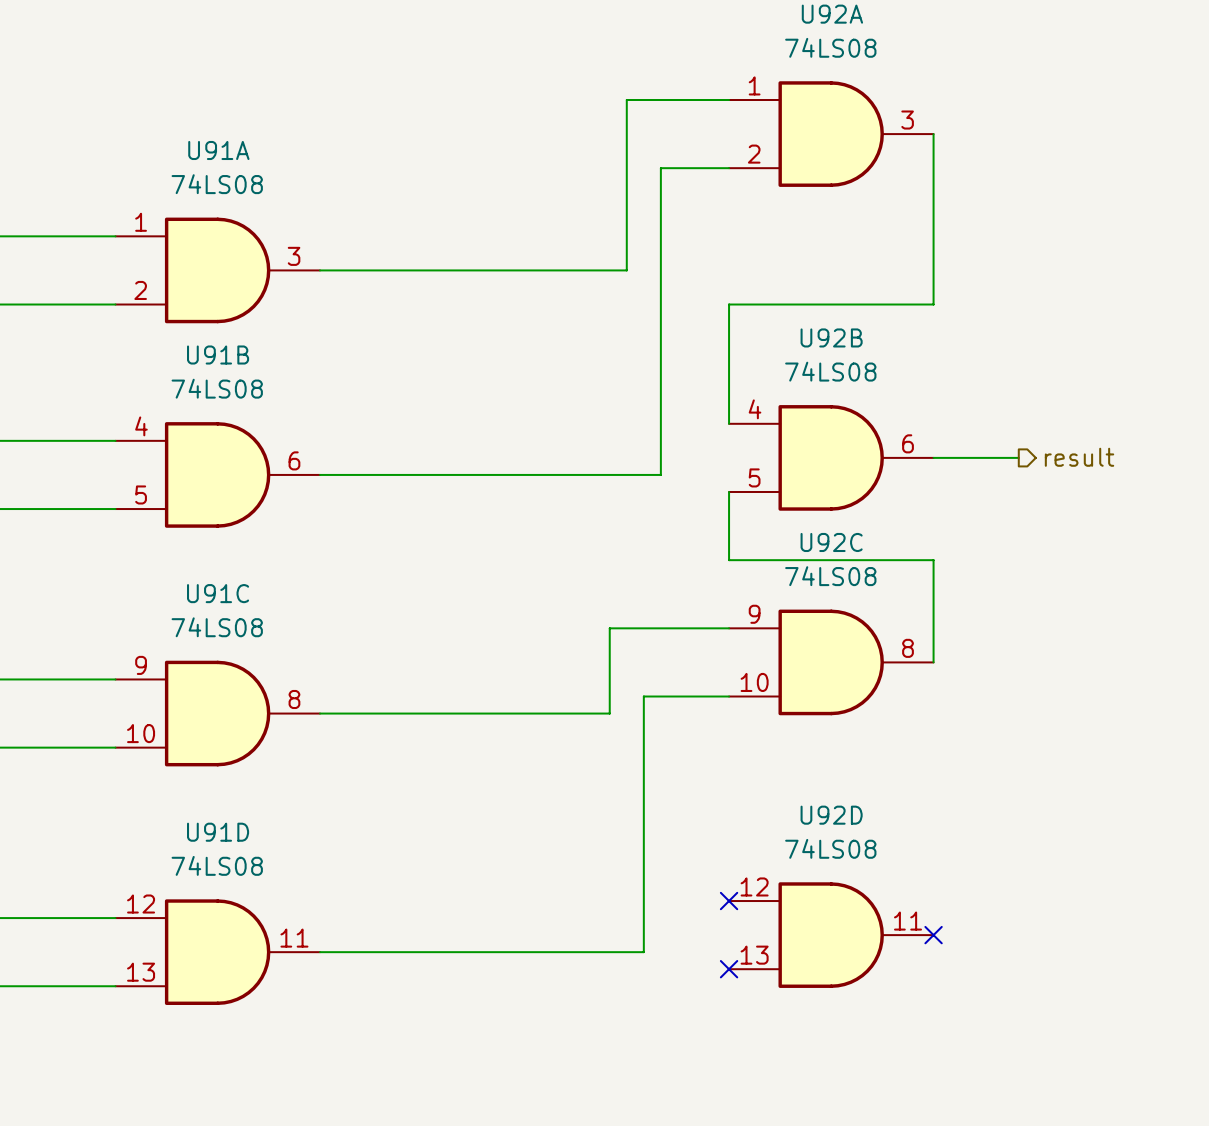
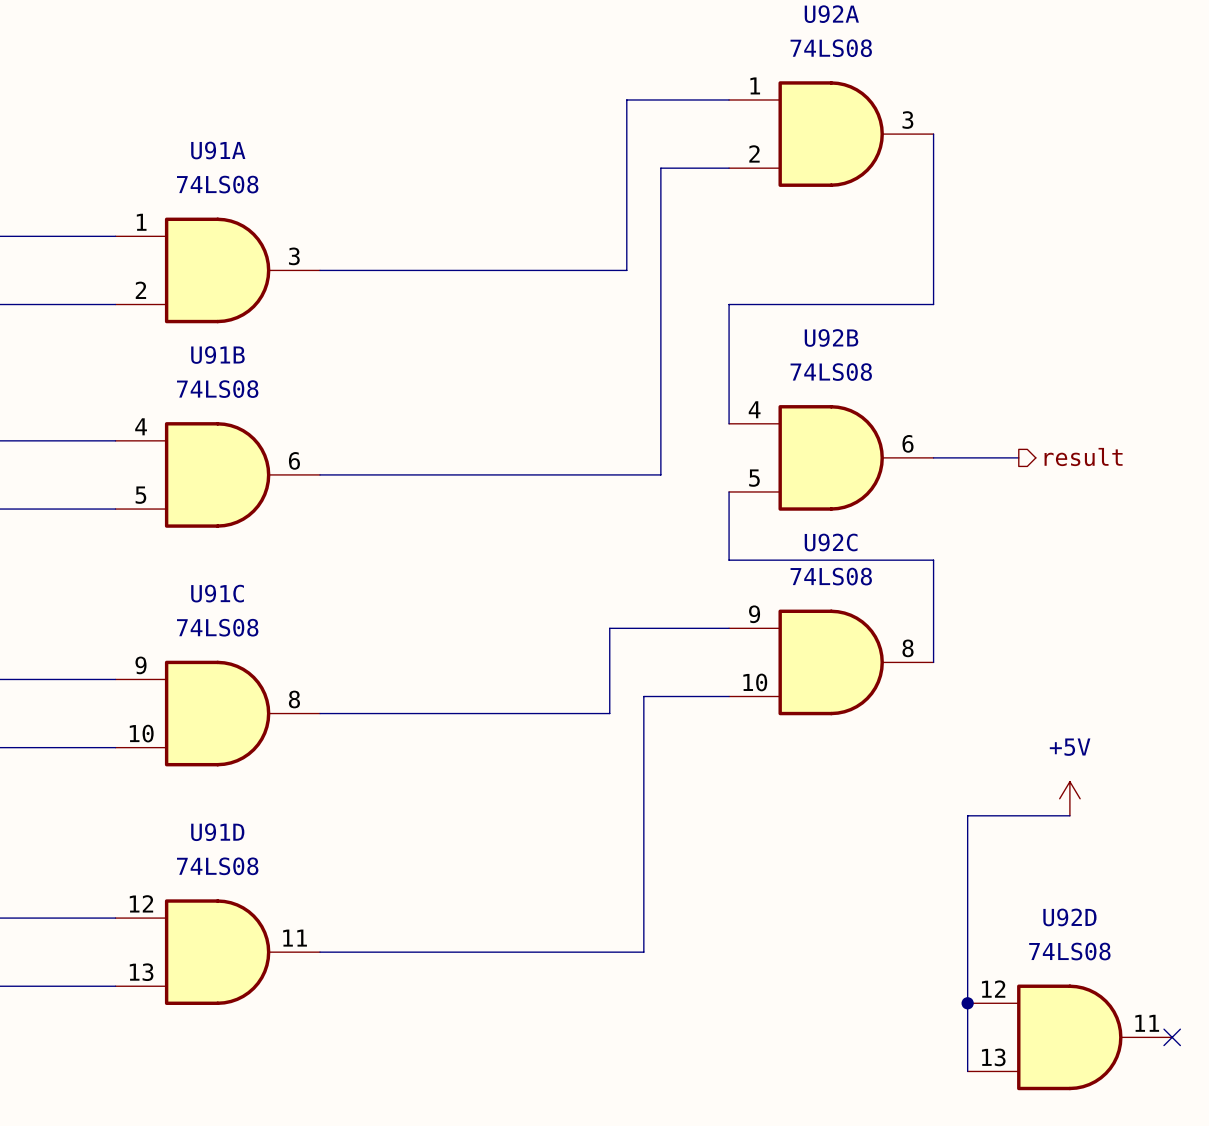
power symbol: none -> +5V (1069, 798)
wire: none -> (1069, 815) (967, 815) (967, 1071)
no-connect mark: (729, 901) -> none
U92D position: (831, 935) -> (1069, 1037)
no-connect mark: (933, 935) -> none
no-connect mark: (729, 969) -> none
junction: none -> (967, 1003)
no-connect mark: none -> (1172, 1037)

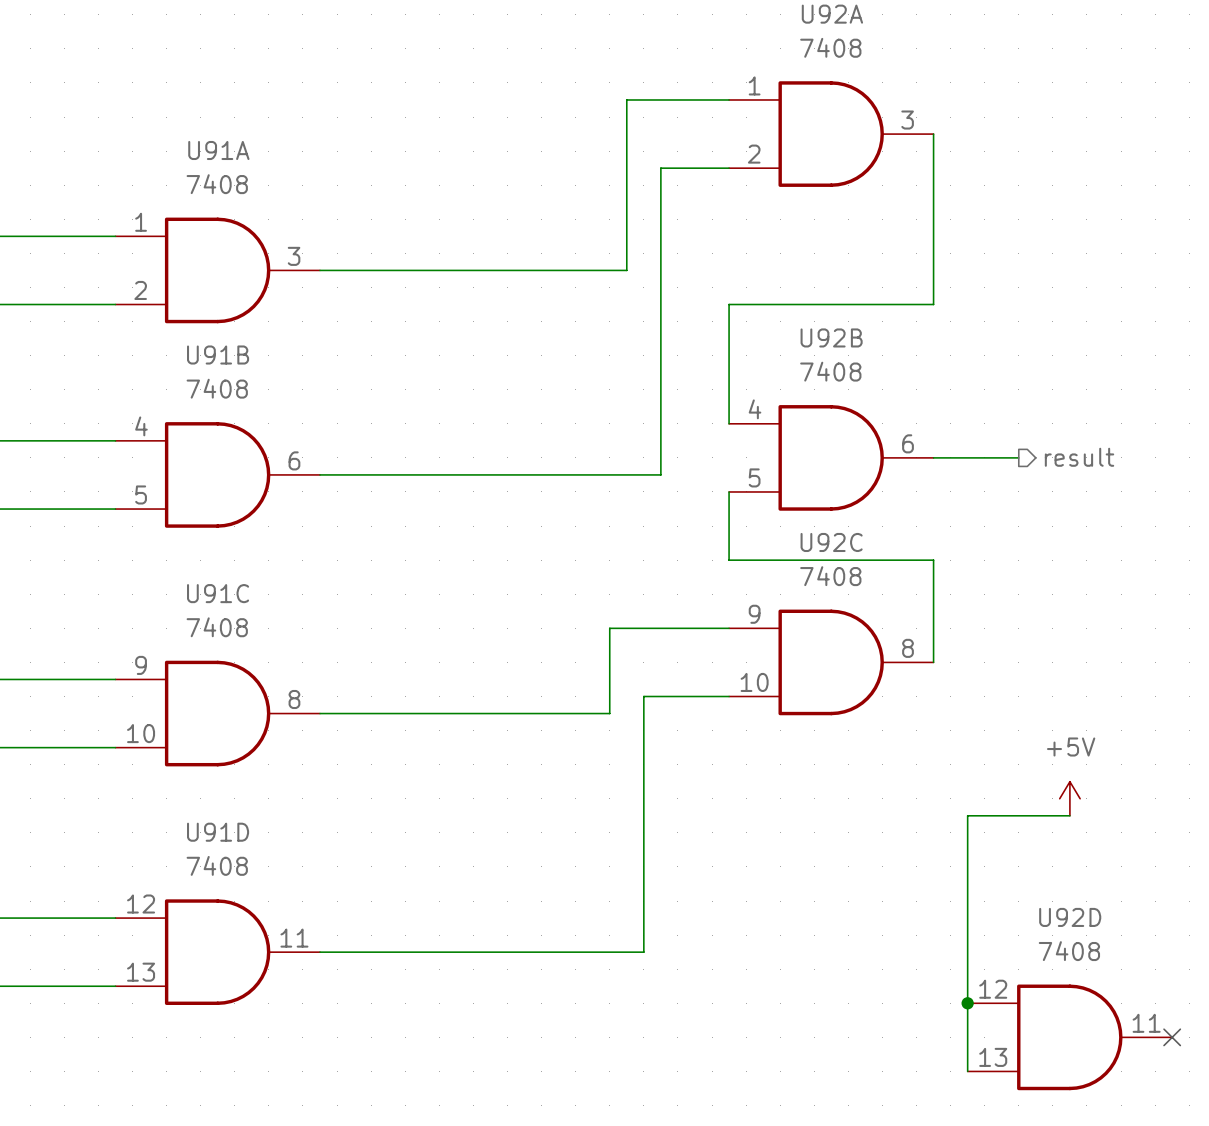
U92A value: 74LS08 (831, 48) -> 7408 (830, 47)
U91A value: 74LS08 (217, 184) -> 7408 (217, 184)
U92B value: 74LS08 (831, 372) -> 7408 (830, 371)
U91B value: 74LS08 (217, 389) -> 7408 (217, 388)
U92C value: 74LS08 (831, 576) -> 7408 (830, 576)
U91C value: 74LS08 (217, 627) -> 7408 (217, 627)
U91D value: 74LS08 (217, 866) -> 7408 (217, 865)
U92D value: 74LS08 (1069, 951) -> 7408 (1069, 951)

